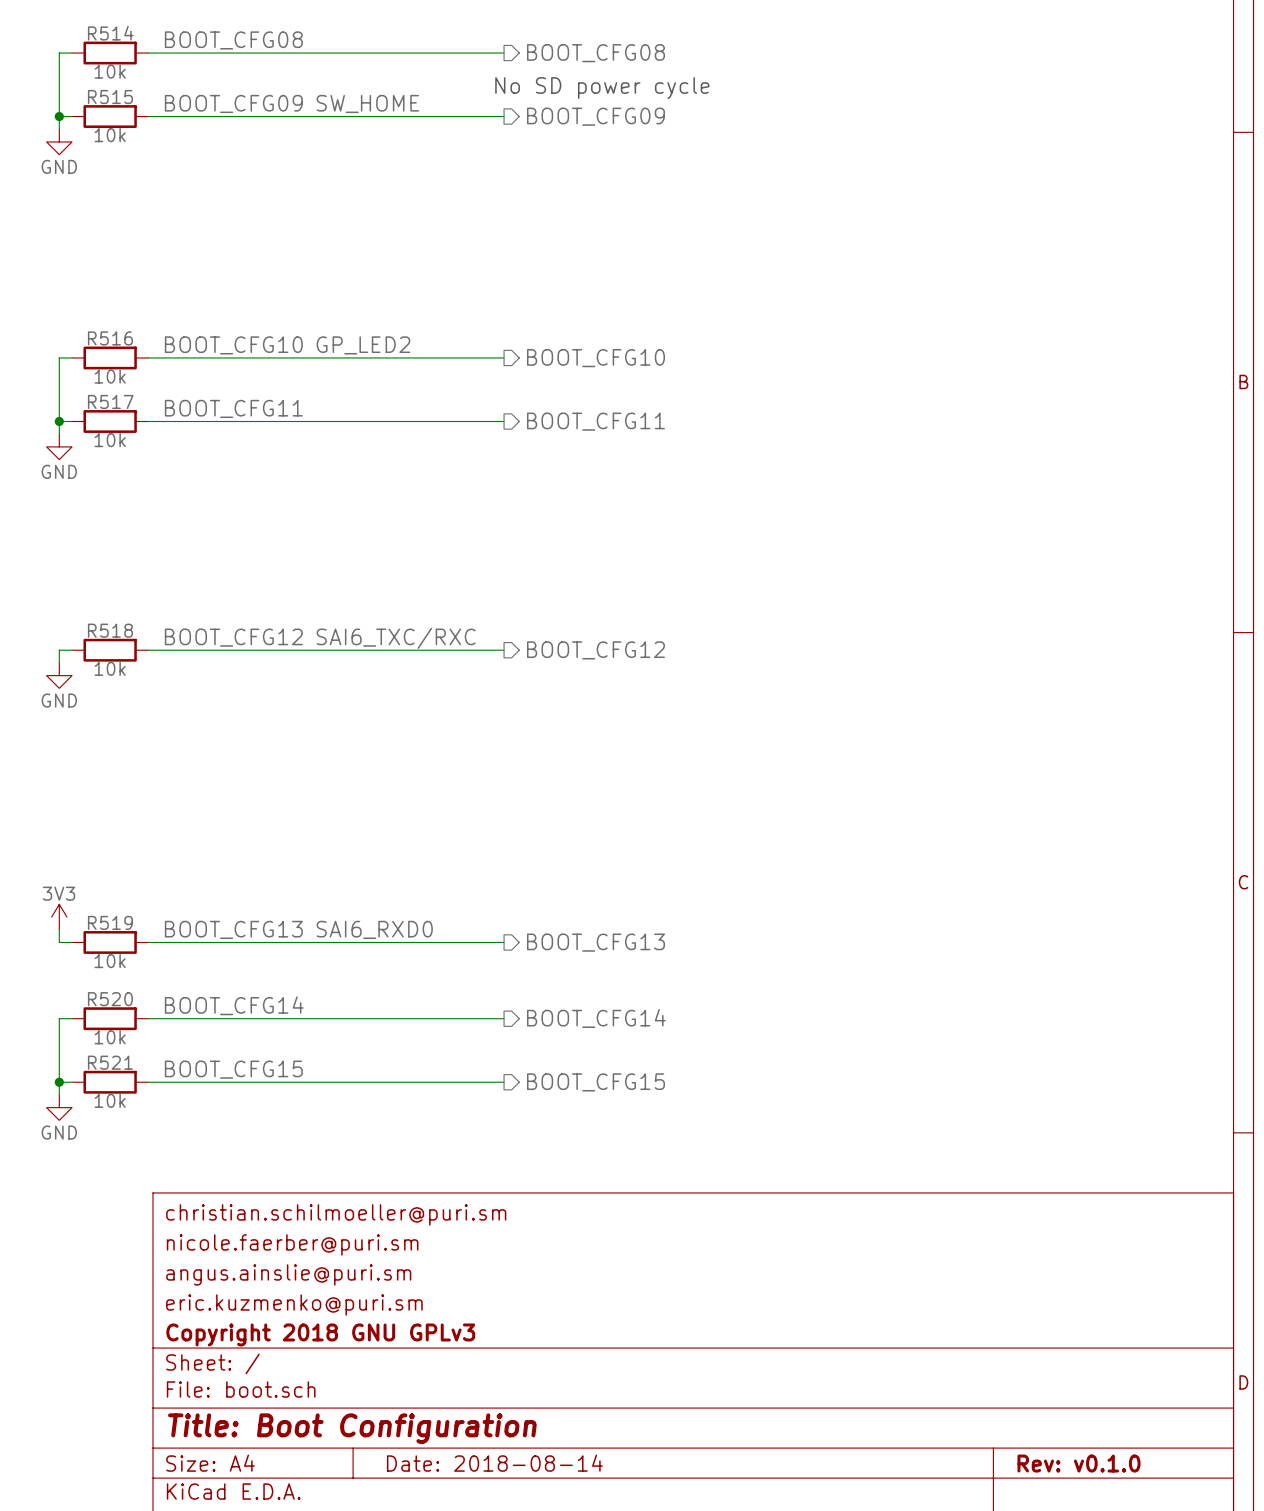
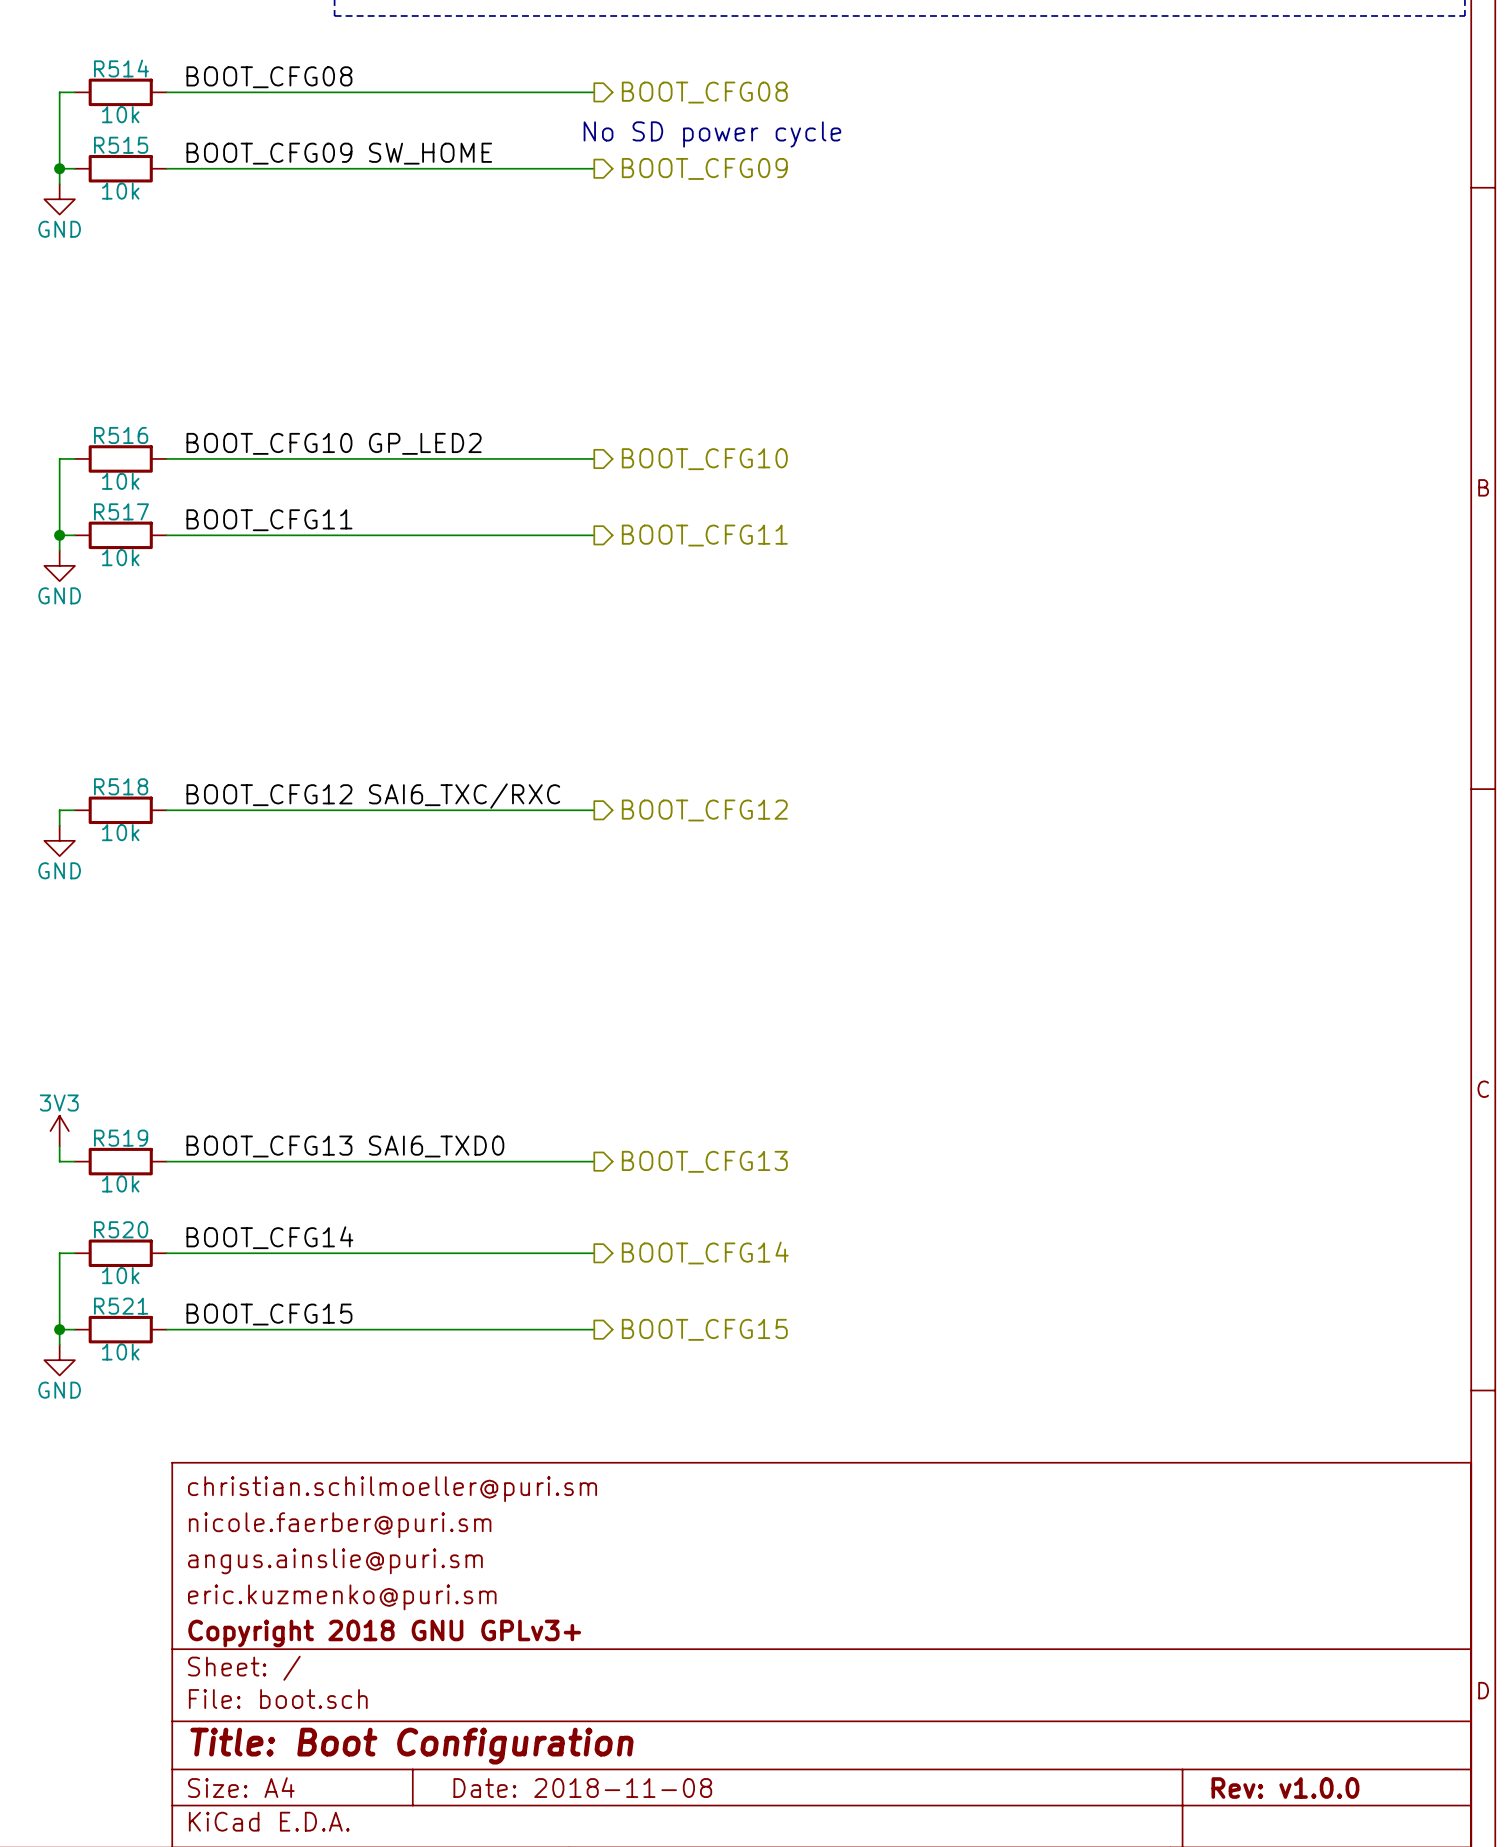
label: SAI6_RXD0 (374, 929) -> SAI6_TXD0 (436, 1146)
title block: Copyright 2018 GNU GPLv3 (320, 1334) -> Copyright 2018 GNU GPLv3+ (384, 1633)
title block: Date: 2018-08-14 (494, 1463) -> Date: 2018-11-08 (582, 1788)
title block: Rev: v0.1.0 (1078, 1463) -> Rev: v1.0.0 (1285, 1788)

